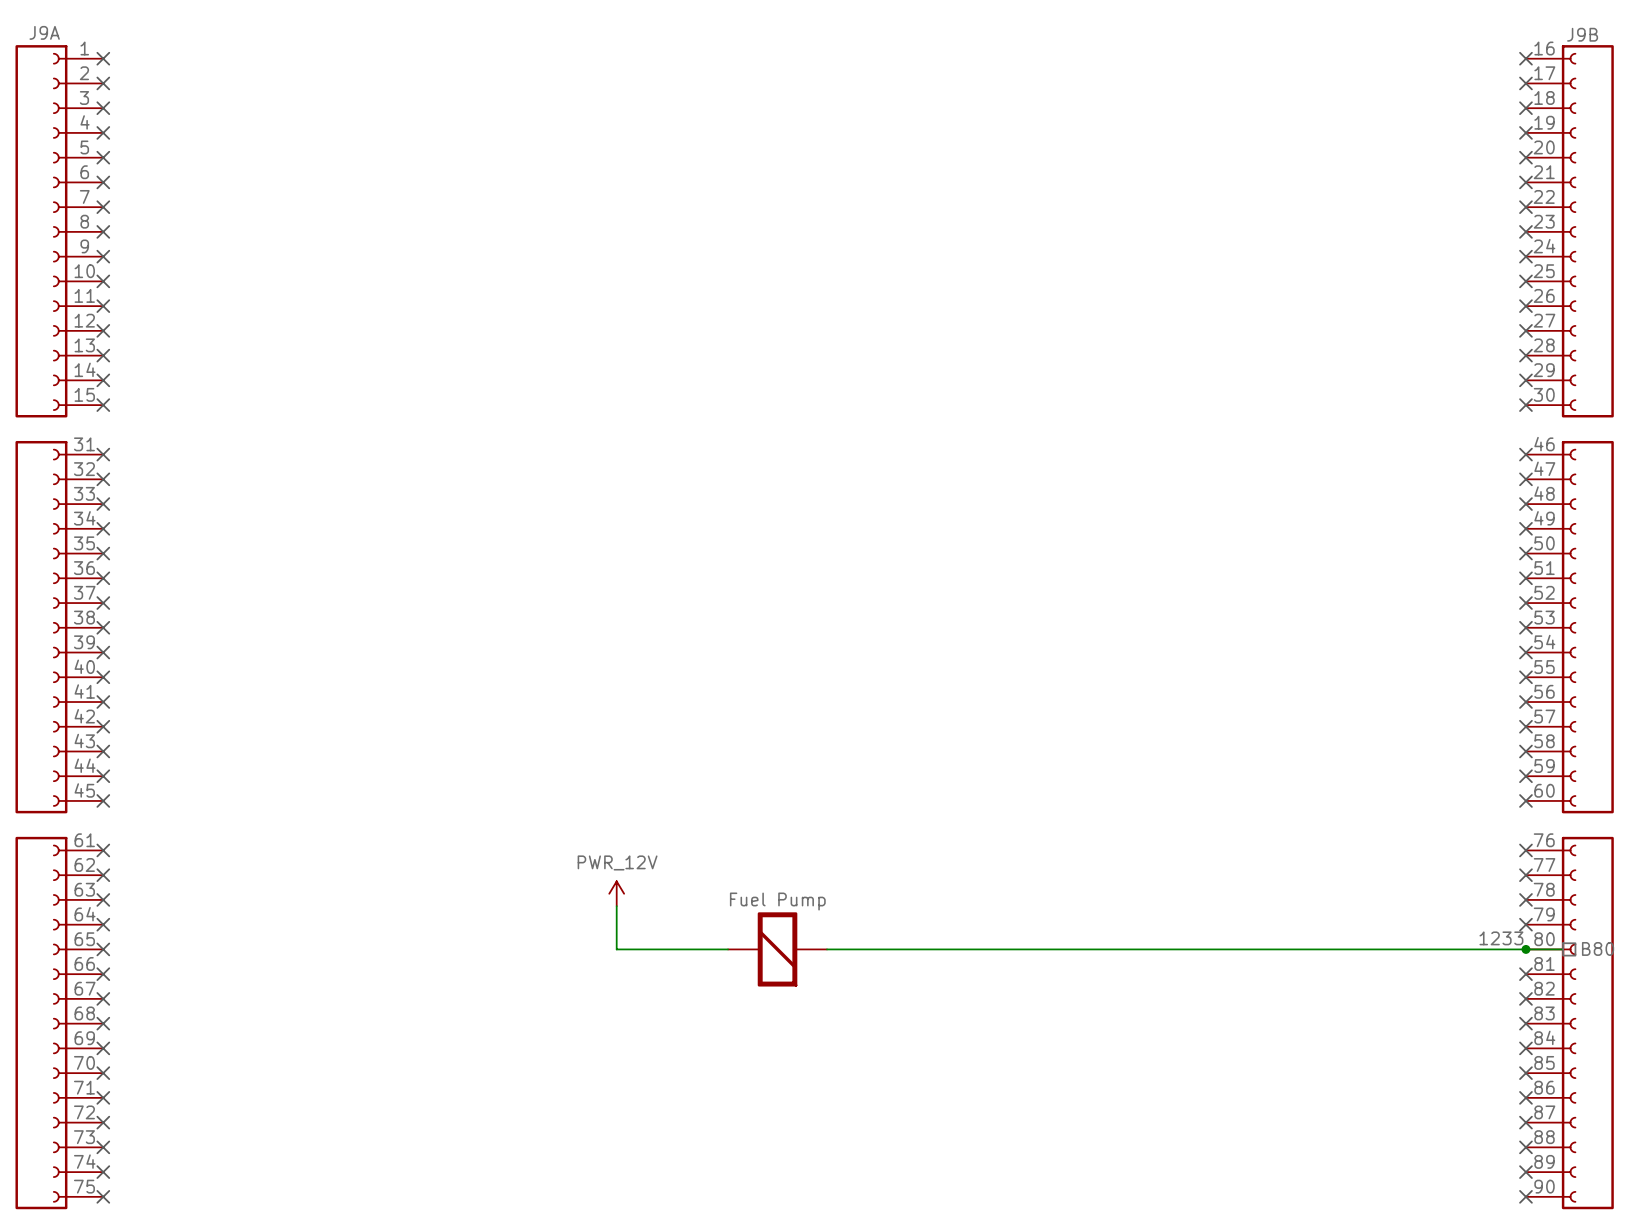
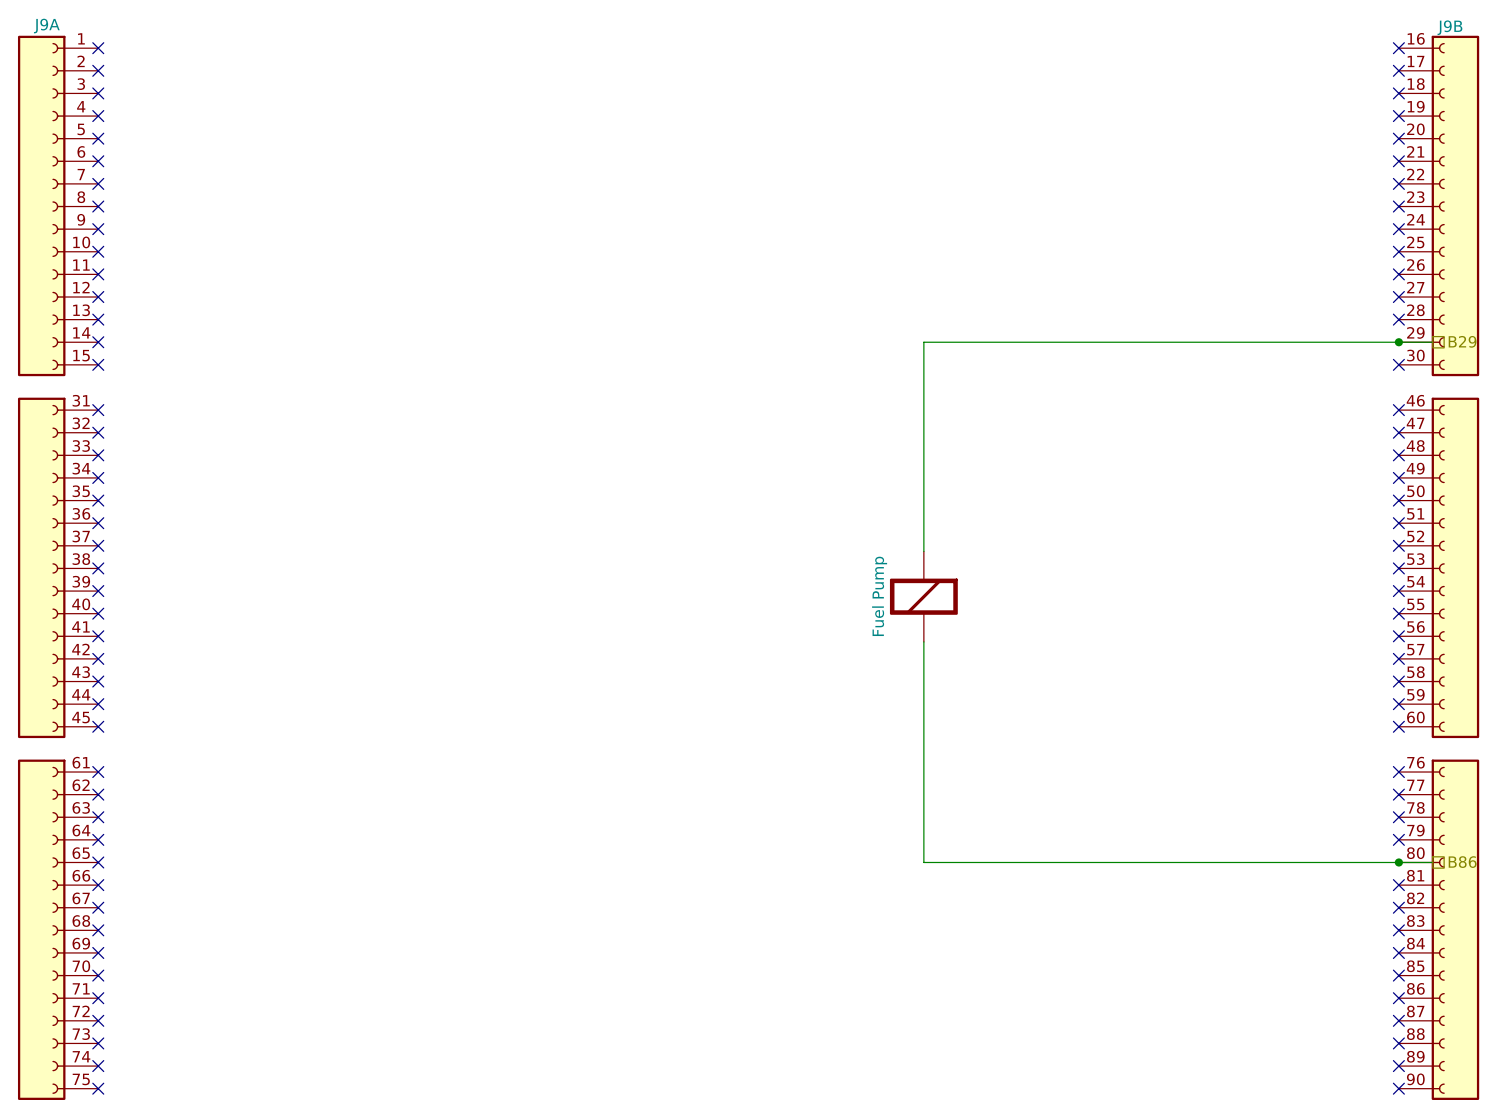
hierarchical label: none -> B29 (1462, 341)
no-connect mark: (1525, 380) -> none
junction: none -> (1398, 342)
wire: none -> (1432, 342) (923, 342) (923, 551)
part: none -> Fuel Pump (923, 596)
power symbol: PWR_12V (616, 893) -> none
wire: (616, 906) (616, 949) (728, 949) -> none
label: 1233 (1501, 938) -> none
hierarchical label: B80 (1598, 948) -> B86 (1462, 862)
part: Fuel Pump (777, 949) -> none
wire: (827, 949) (1006, 949) -> (923, 641) (923, 862)

